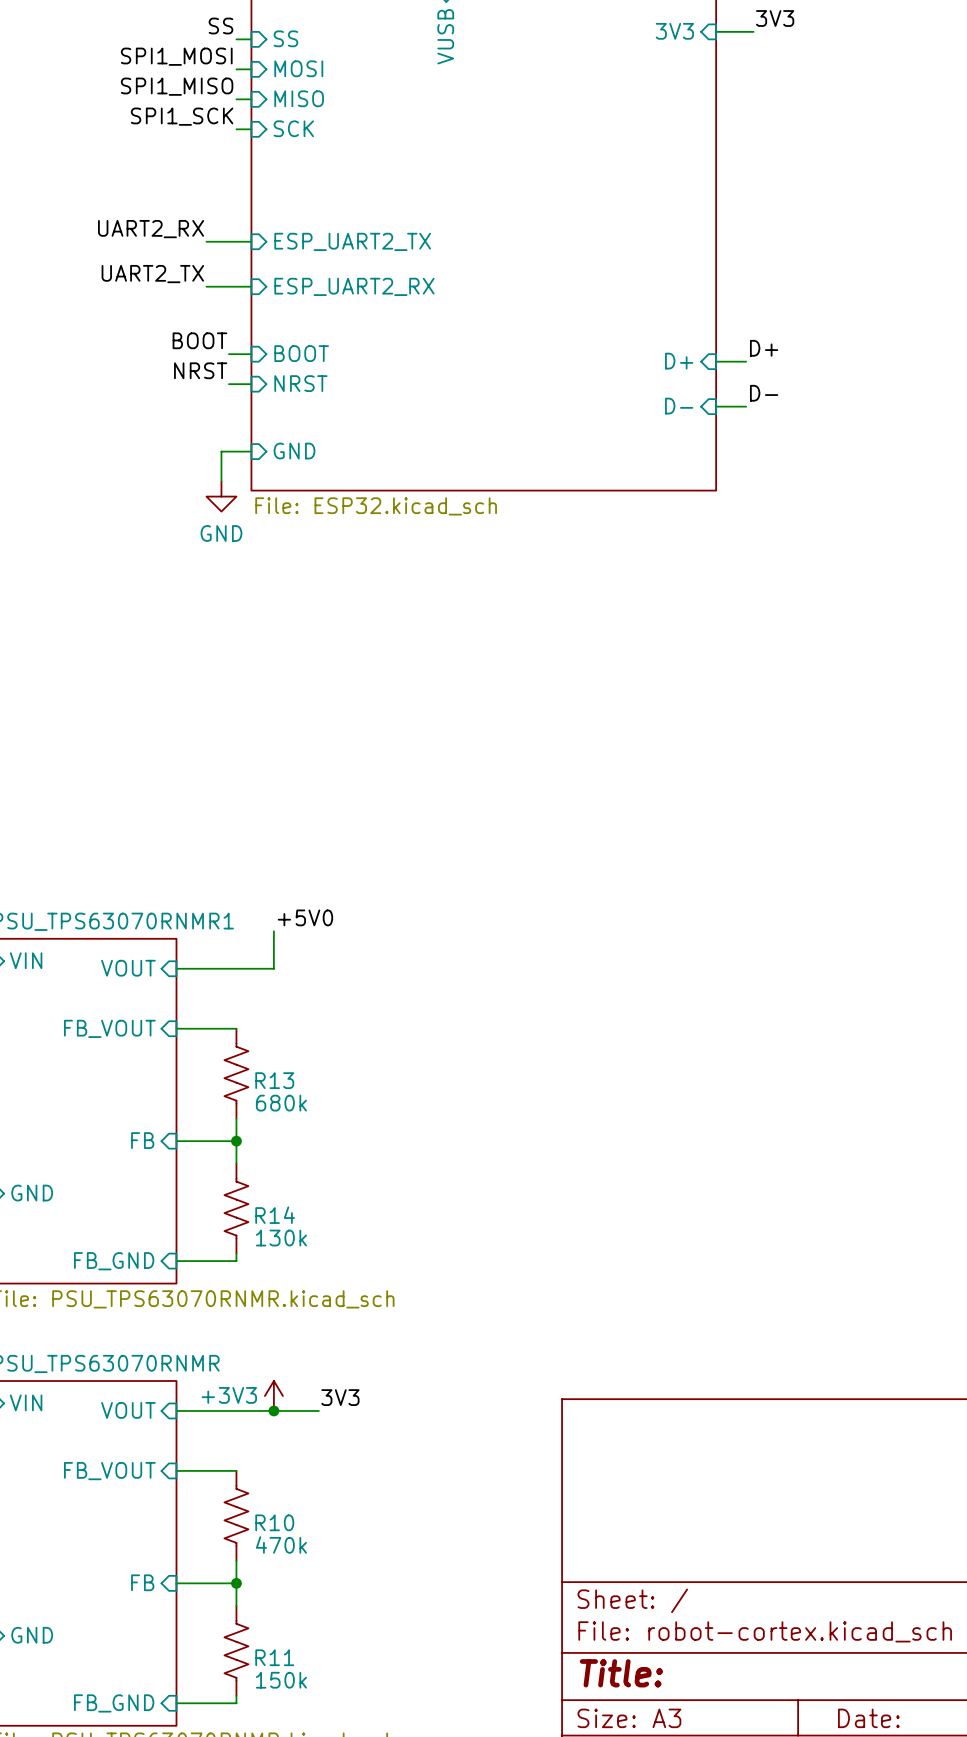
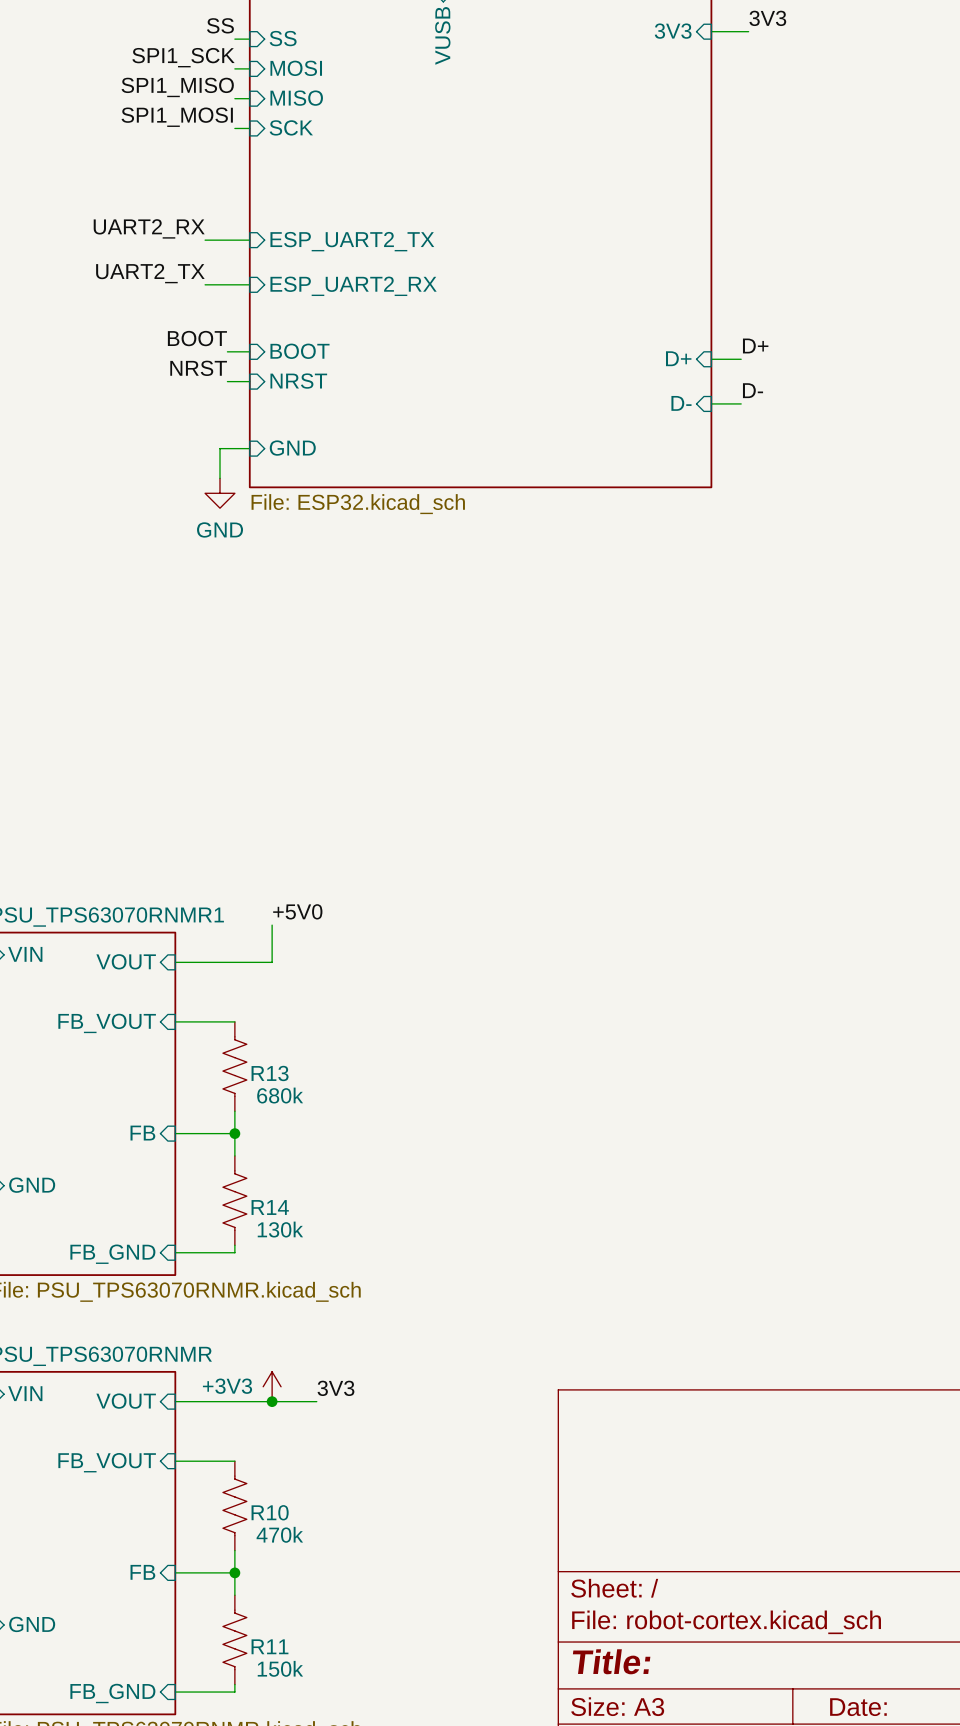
label: SPI1_MOSI (176, 56) -> SPI1_SCK (183, 57)
label: SPI1_SCK (182, 116) -> SPI1_MOSI (177, 117)

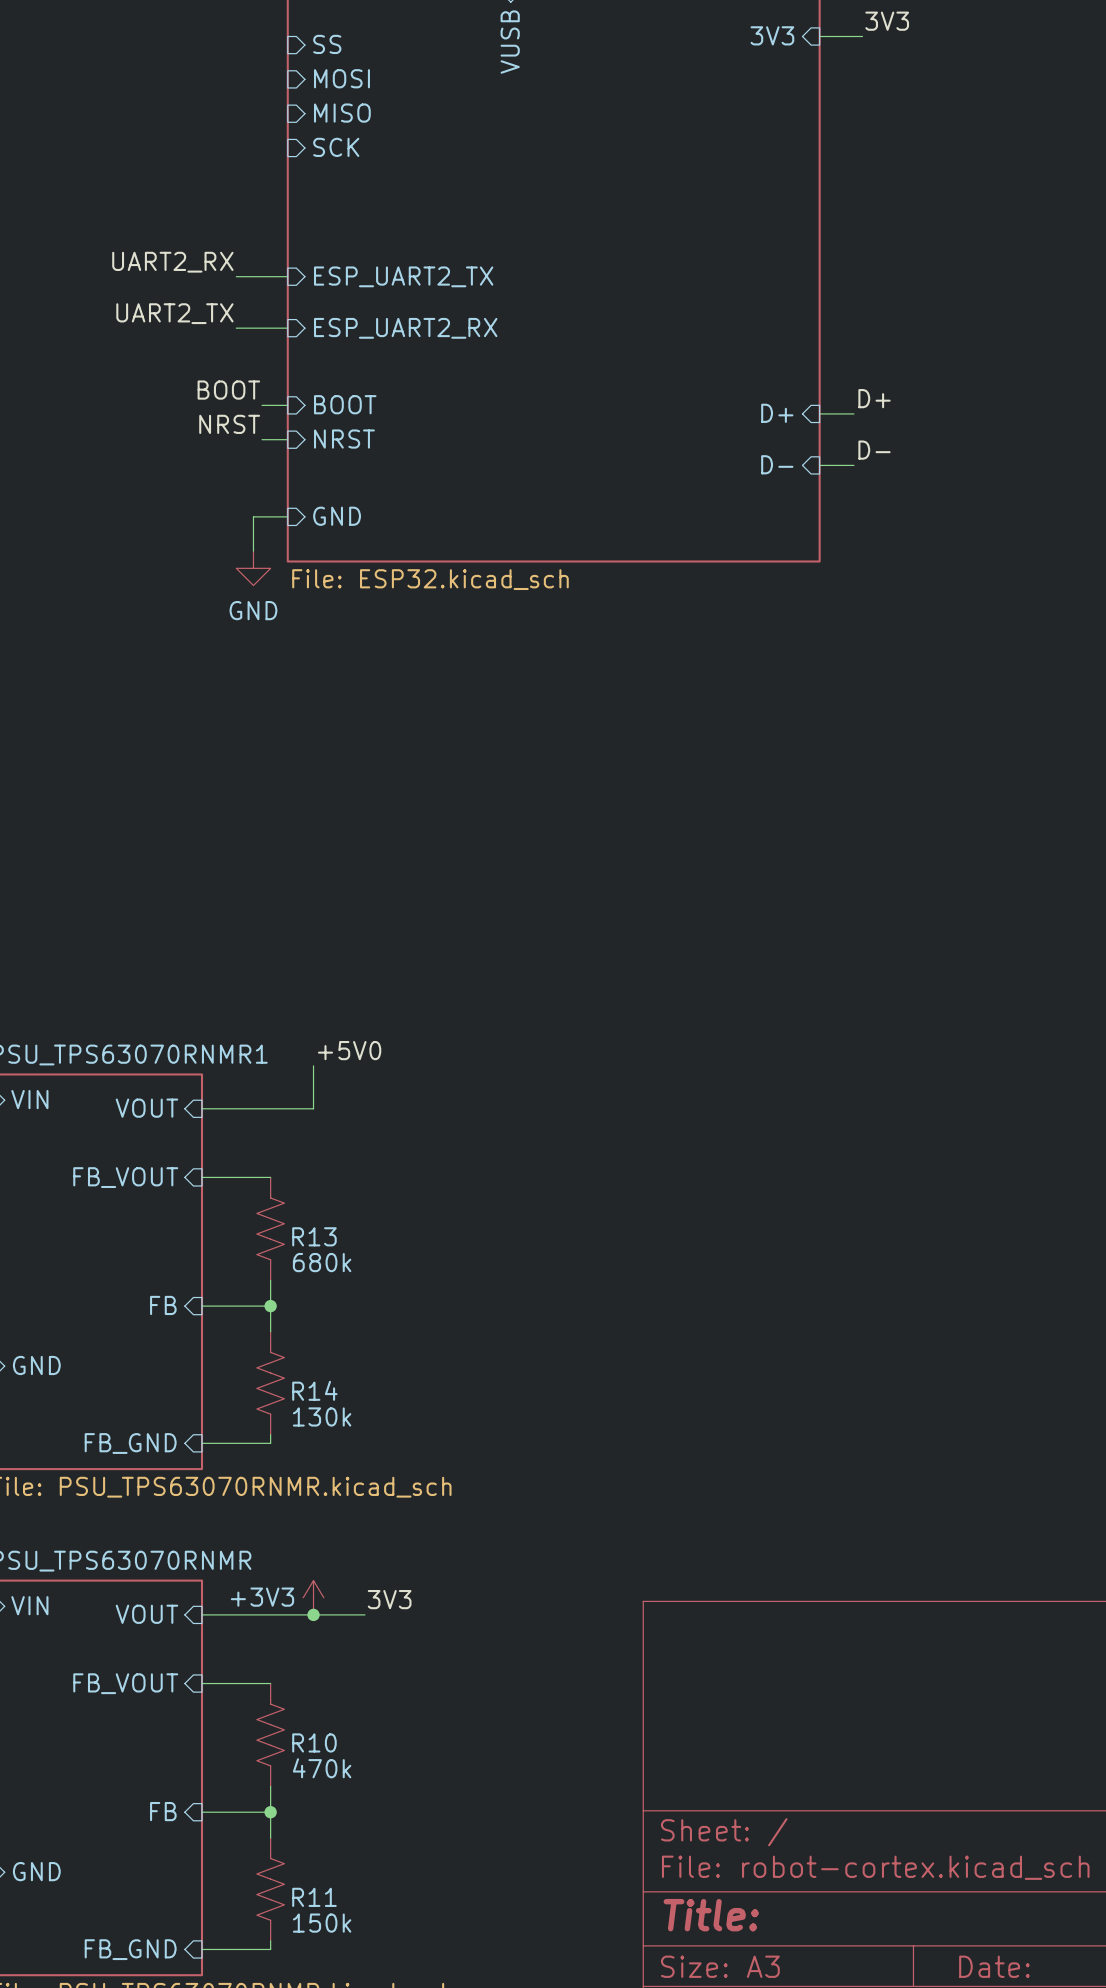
label: SS (220, 25) -> none
wire: (234, 39) (249, 39) -> none
label: SPI1_SCK (183, 57) -> none
wire: (234, 68) (249, 68) -> none
label: SPI1_MISO (177, 87) -> none
wire: (234, 98) (249, 98) -> none
label: SPI1_MOSI (177, 117) -> none
wire: (234, 128) (249, 128) -> none

